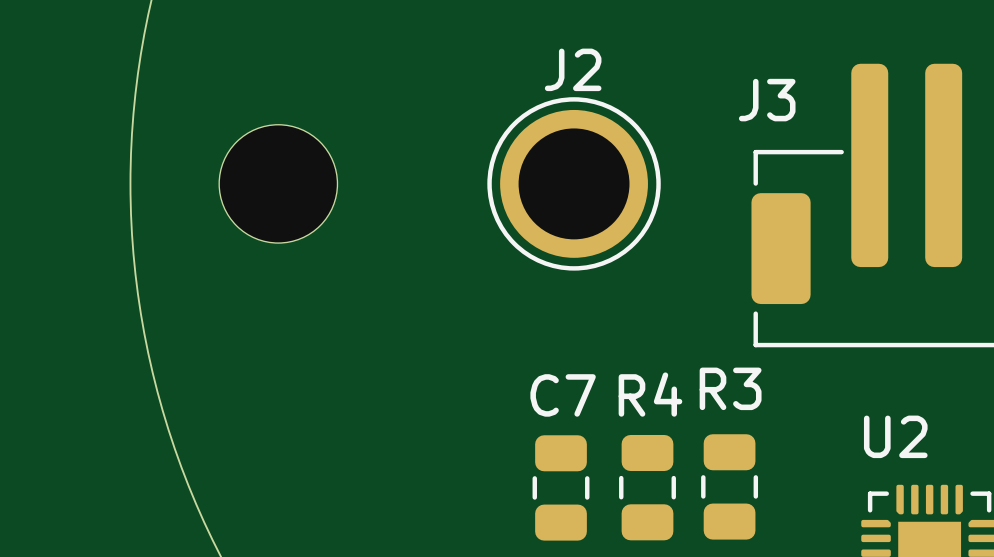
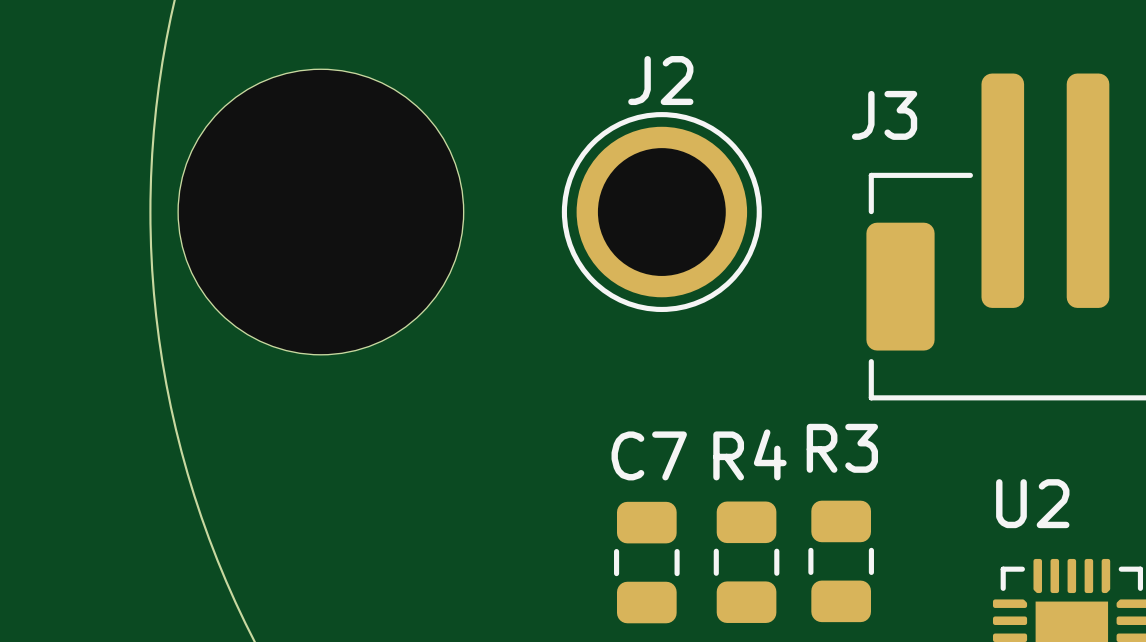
part footprint: [219, 124, 338, 244] -> [178, 69, 464, 355]

